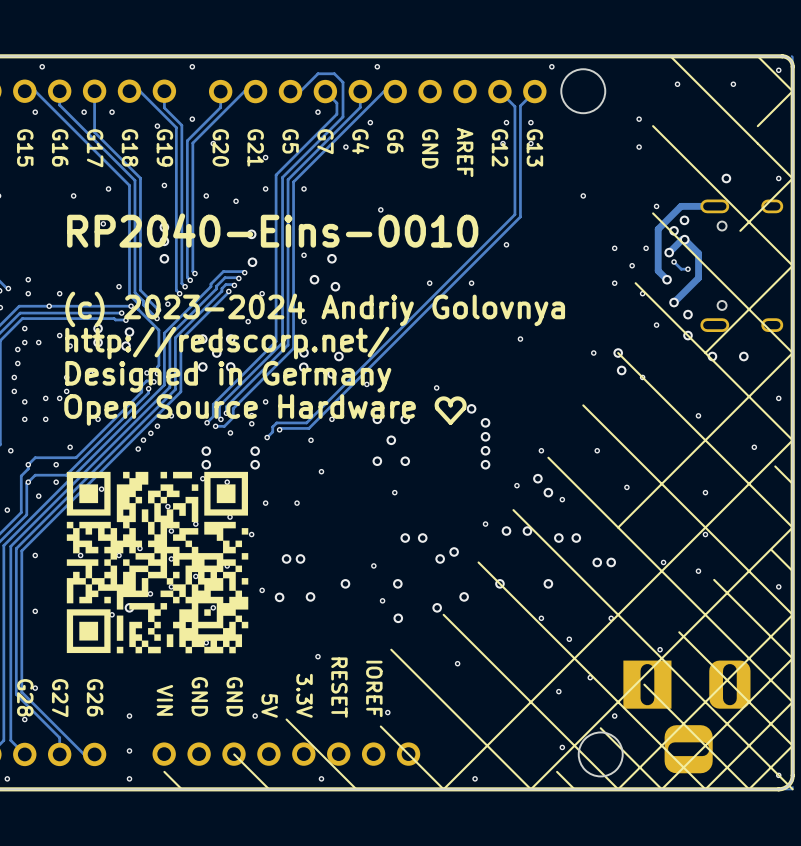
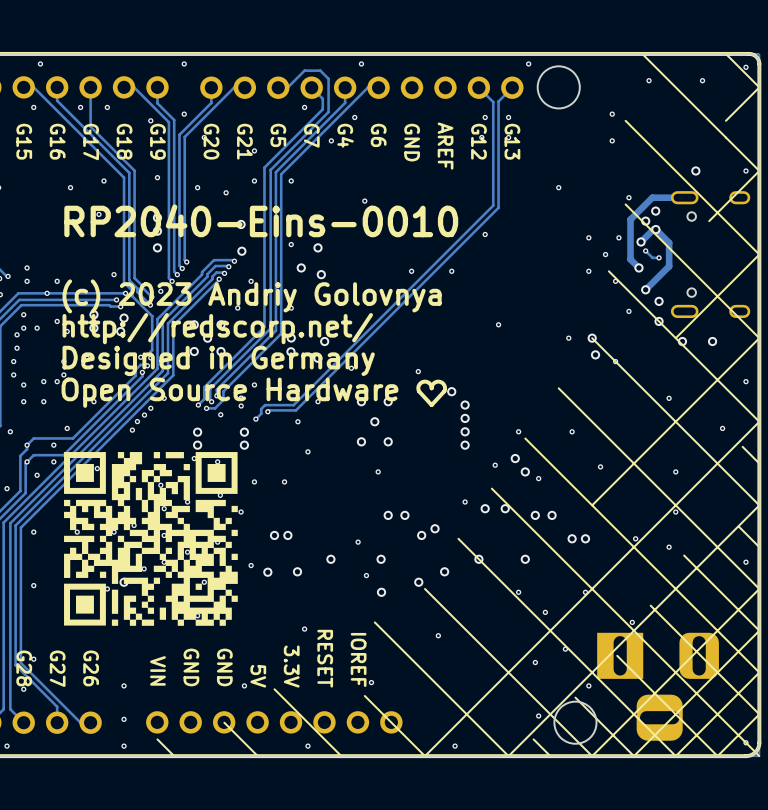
text: (c) 2023-2024 Andriy Golovnya (315, 309) -> (c) 2023 Andriy Golovnya (252, 296)

